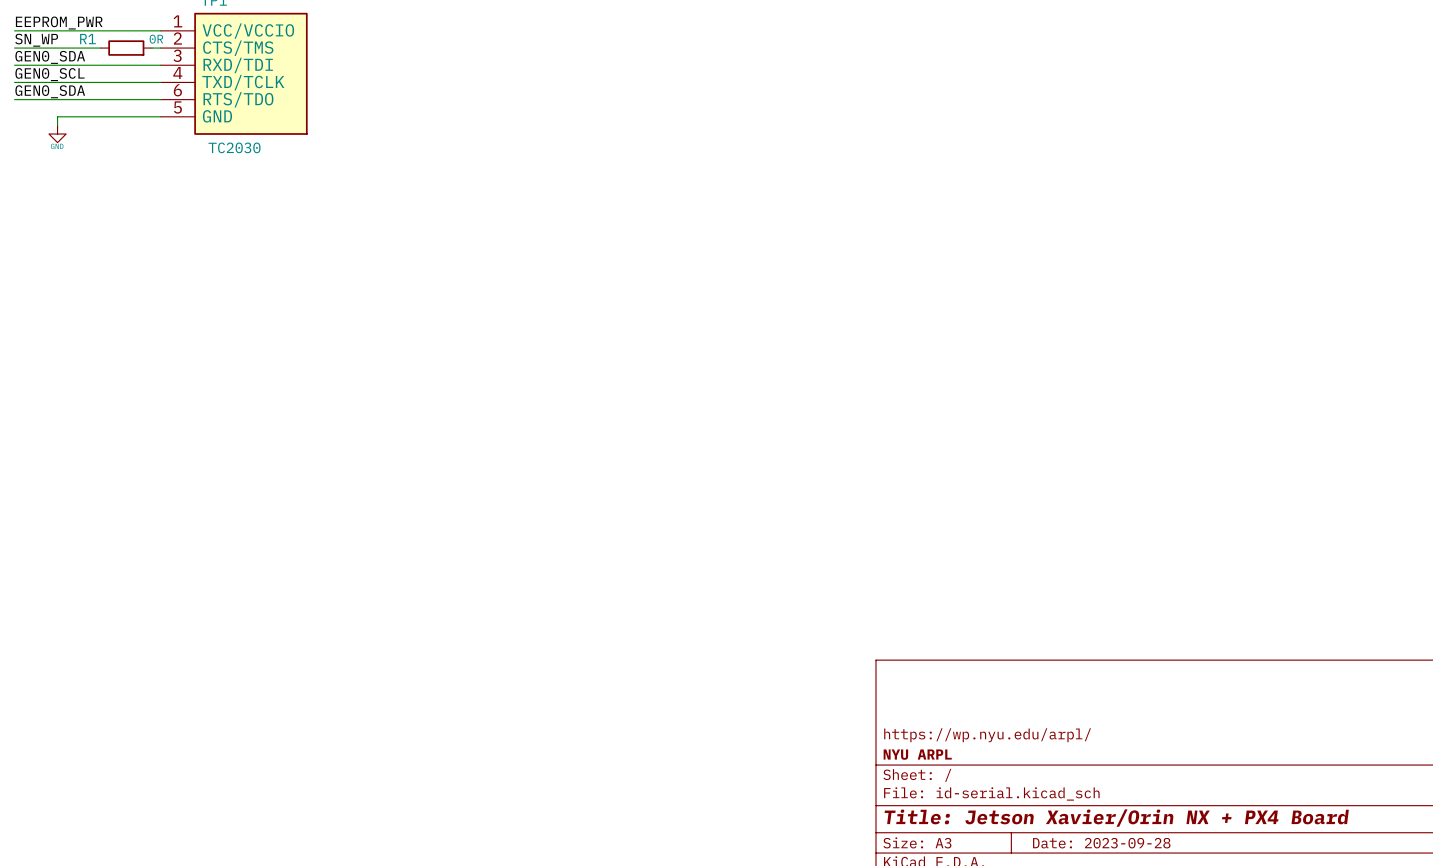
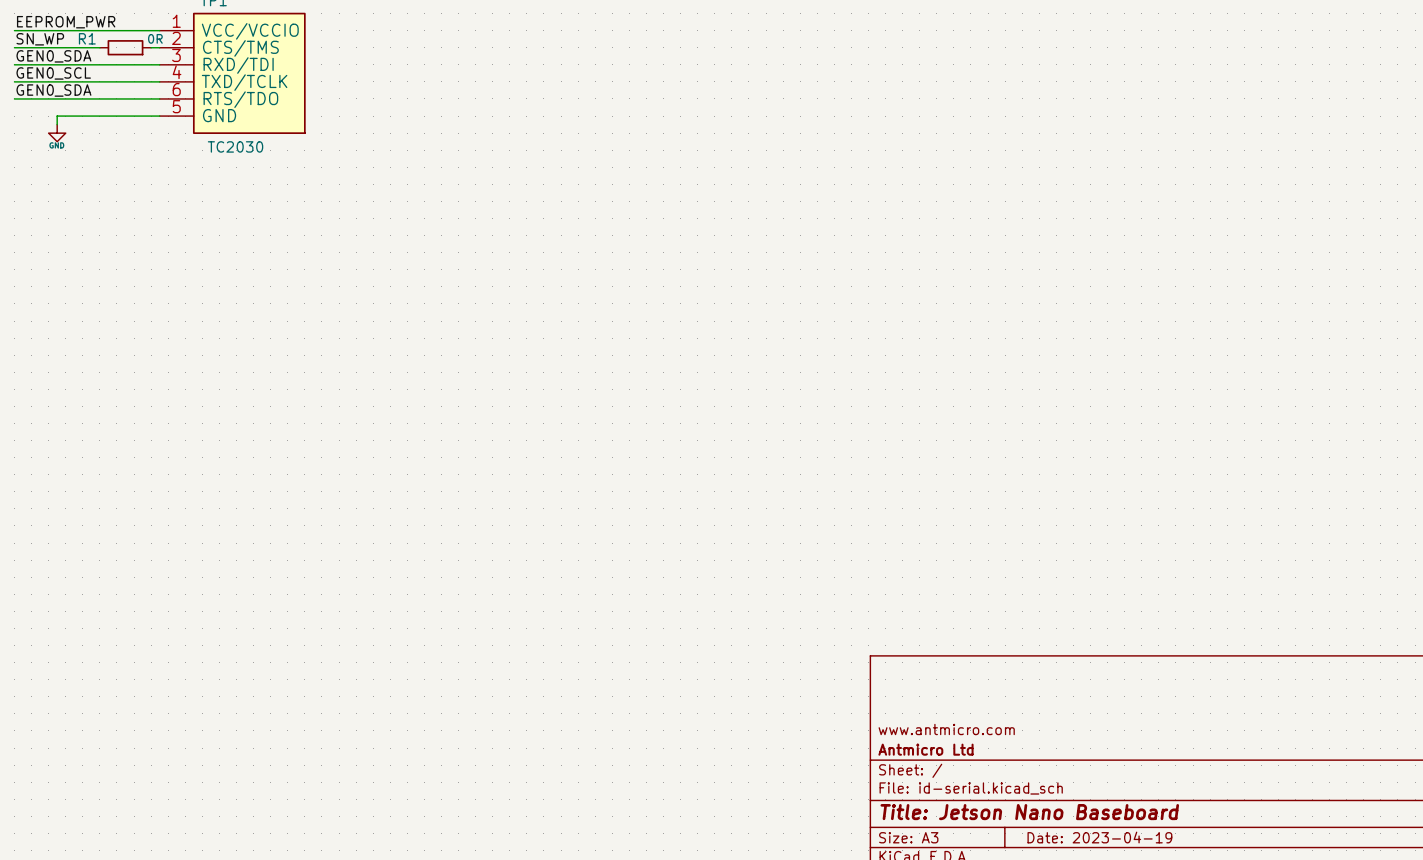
title block: https://wp.nyu.edu/arpl/ (987, 735) -> www.antmicro.com (946, 729)
title block: NYU ARPL (917, 754) -> Antmicro Ltd (925, 749)
title block: Title: Jetson Xavier/Orin NX + PX4 Board (1116, 818) -> Title: Jetson Nano Baseboard (1029, 812)
title block: Date: 2023-09-28 (1101, 843) -> Date: 2023-04-19 (1099, 837)

